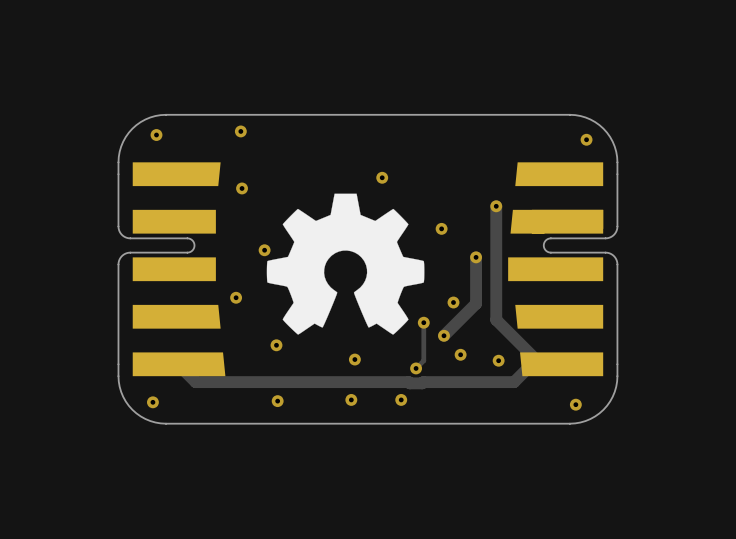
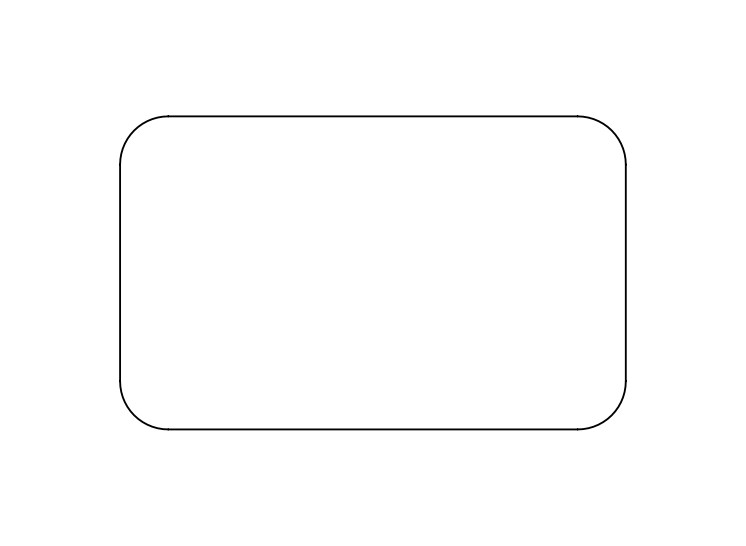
via: (240, 131) -> none
via: (156, 135) -> none
via: (586, 139) -> none
board edge: none -> (120, 176) (120, 369)
board edge: none -> (625, 176) (625, 369)
via: (382, 177) -> none
via: (242, 188) -> none
drawing: [266, 193, 425, 335] -> none
track: (496, 206) (496, 319) (540, 364) -> none
via: (496, 206) -> none
via: (441, 228) -> none
via: (264, 250) -> none
track: (476, 257) (476, 303) (443, 335) -> none
via: (476, 257) -> none
part: (171, 269) -> none
part: (563, 269) -> none
via: (236, 297) -> none
via: (453, 302) -> none
track: (423, 322) (423, 360) (416, 368) -> none
via: (423, 322) -> none
via: (443, 335) -> none
via: (276, 345) -> none
via: (460, 354) -> none
via: (354, 359) -> none
via: (498, 360) -> none
track: (562, 364) (531, 364) (514, 382) (422, 383) (195, 382) (177, 364) -> none
via: (416, 368) -> none
via: (351, 399) -> none
via: (401, 399) -> none
via: (277, 401) -> none
via: (152, 402) -> none
via: (575, 404) -> none

